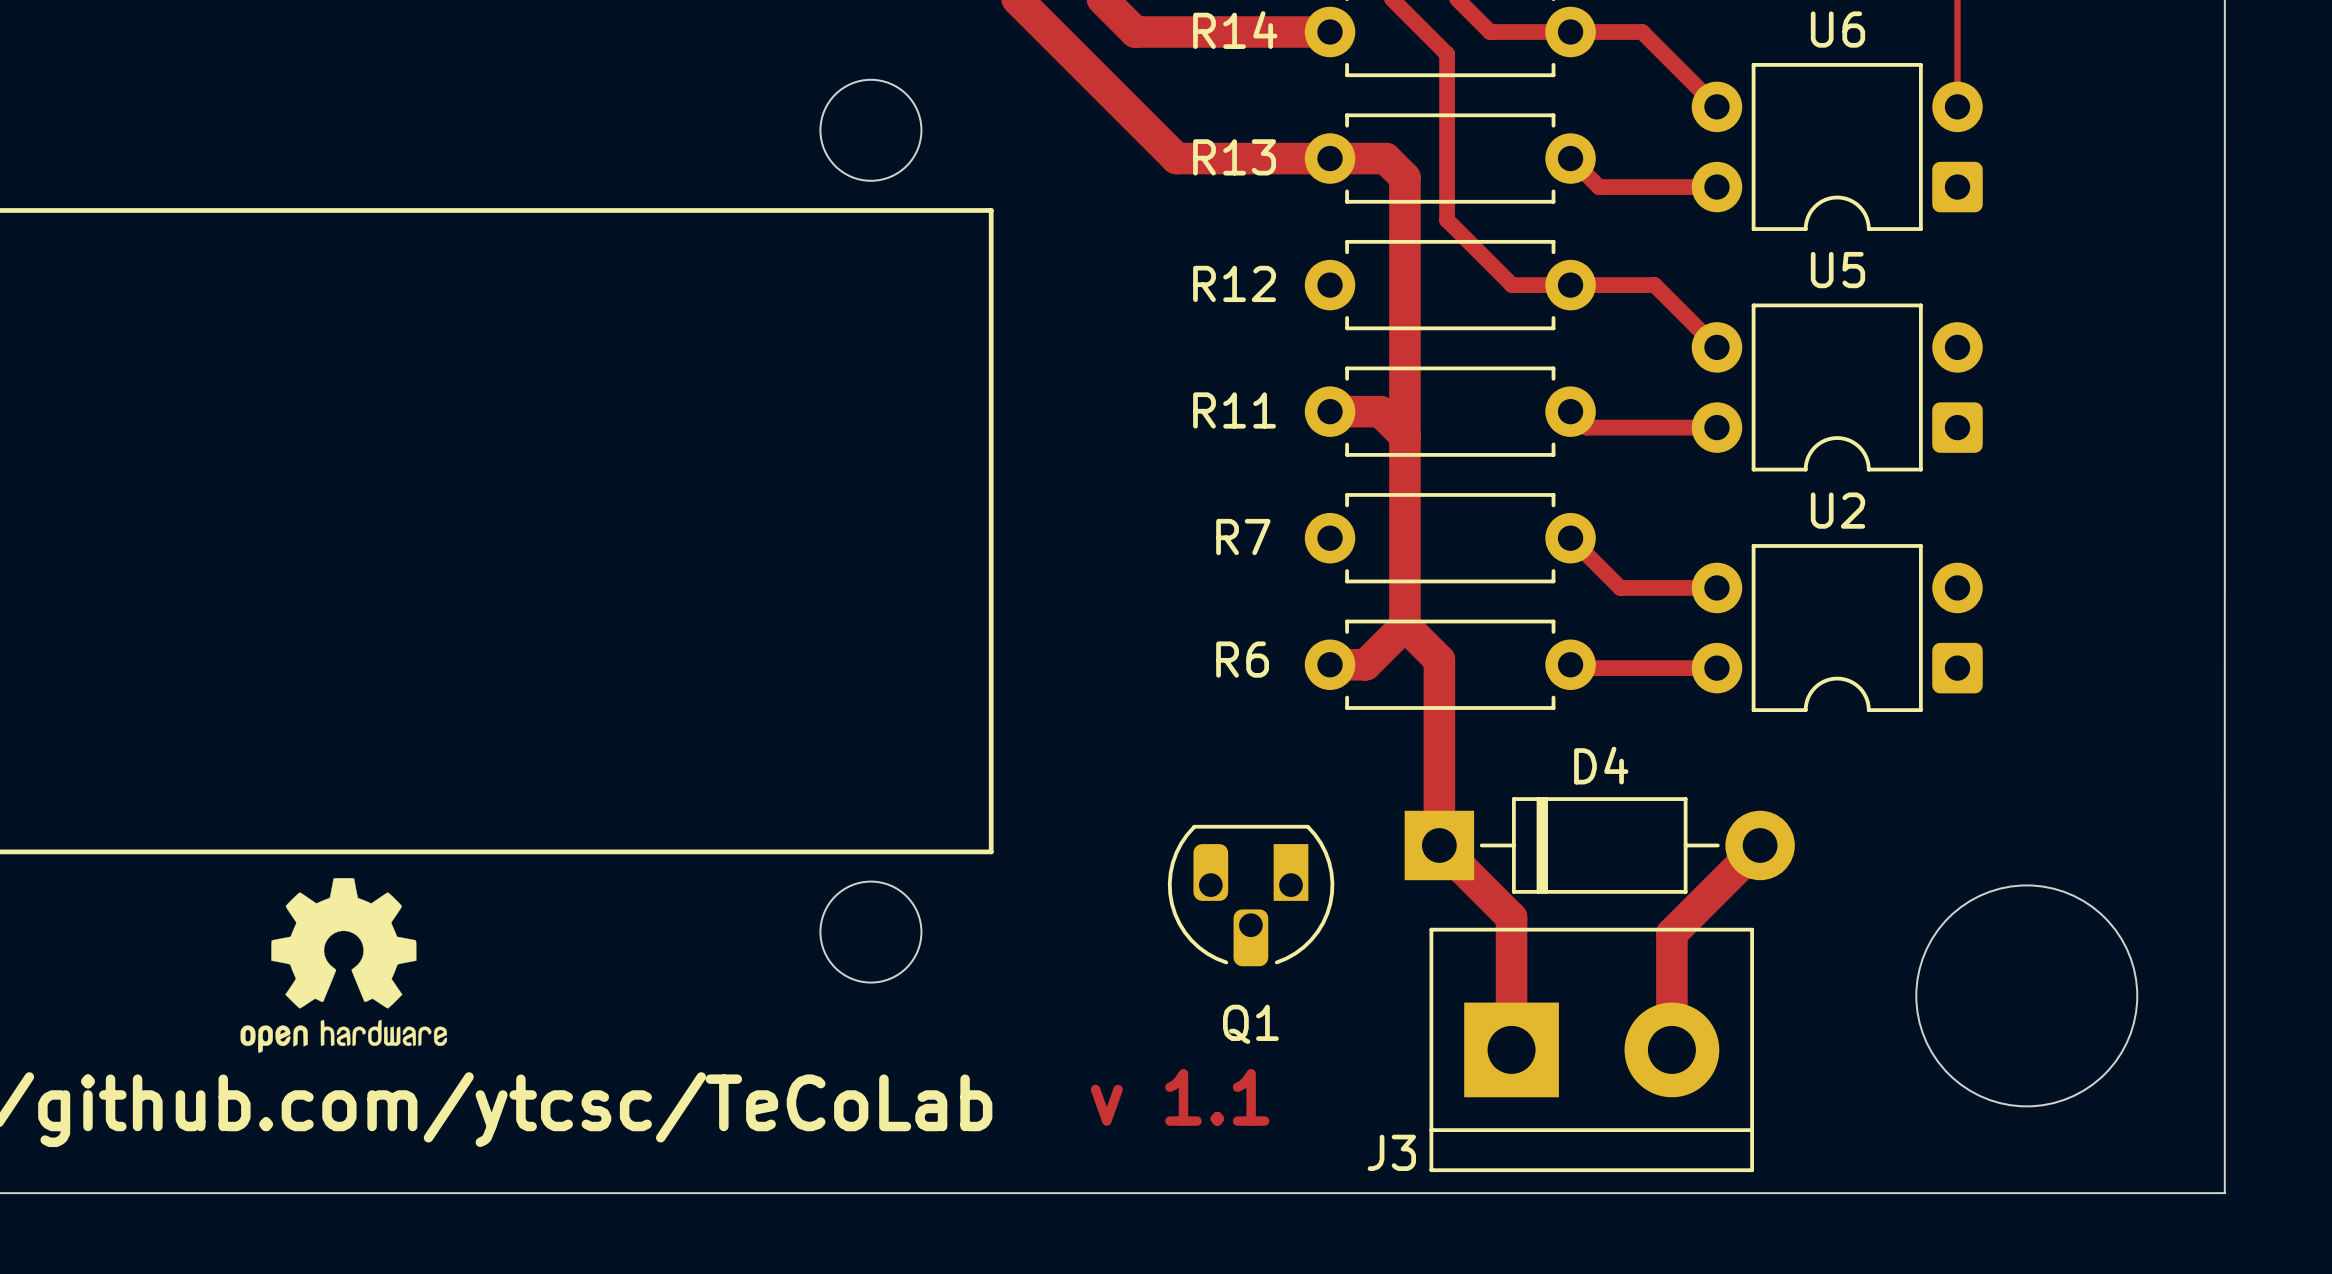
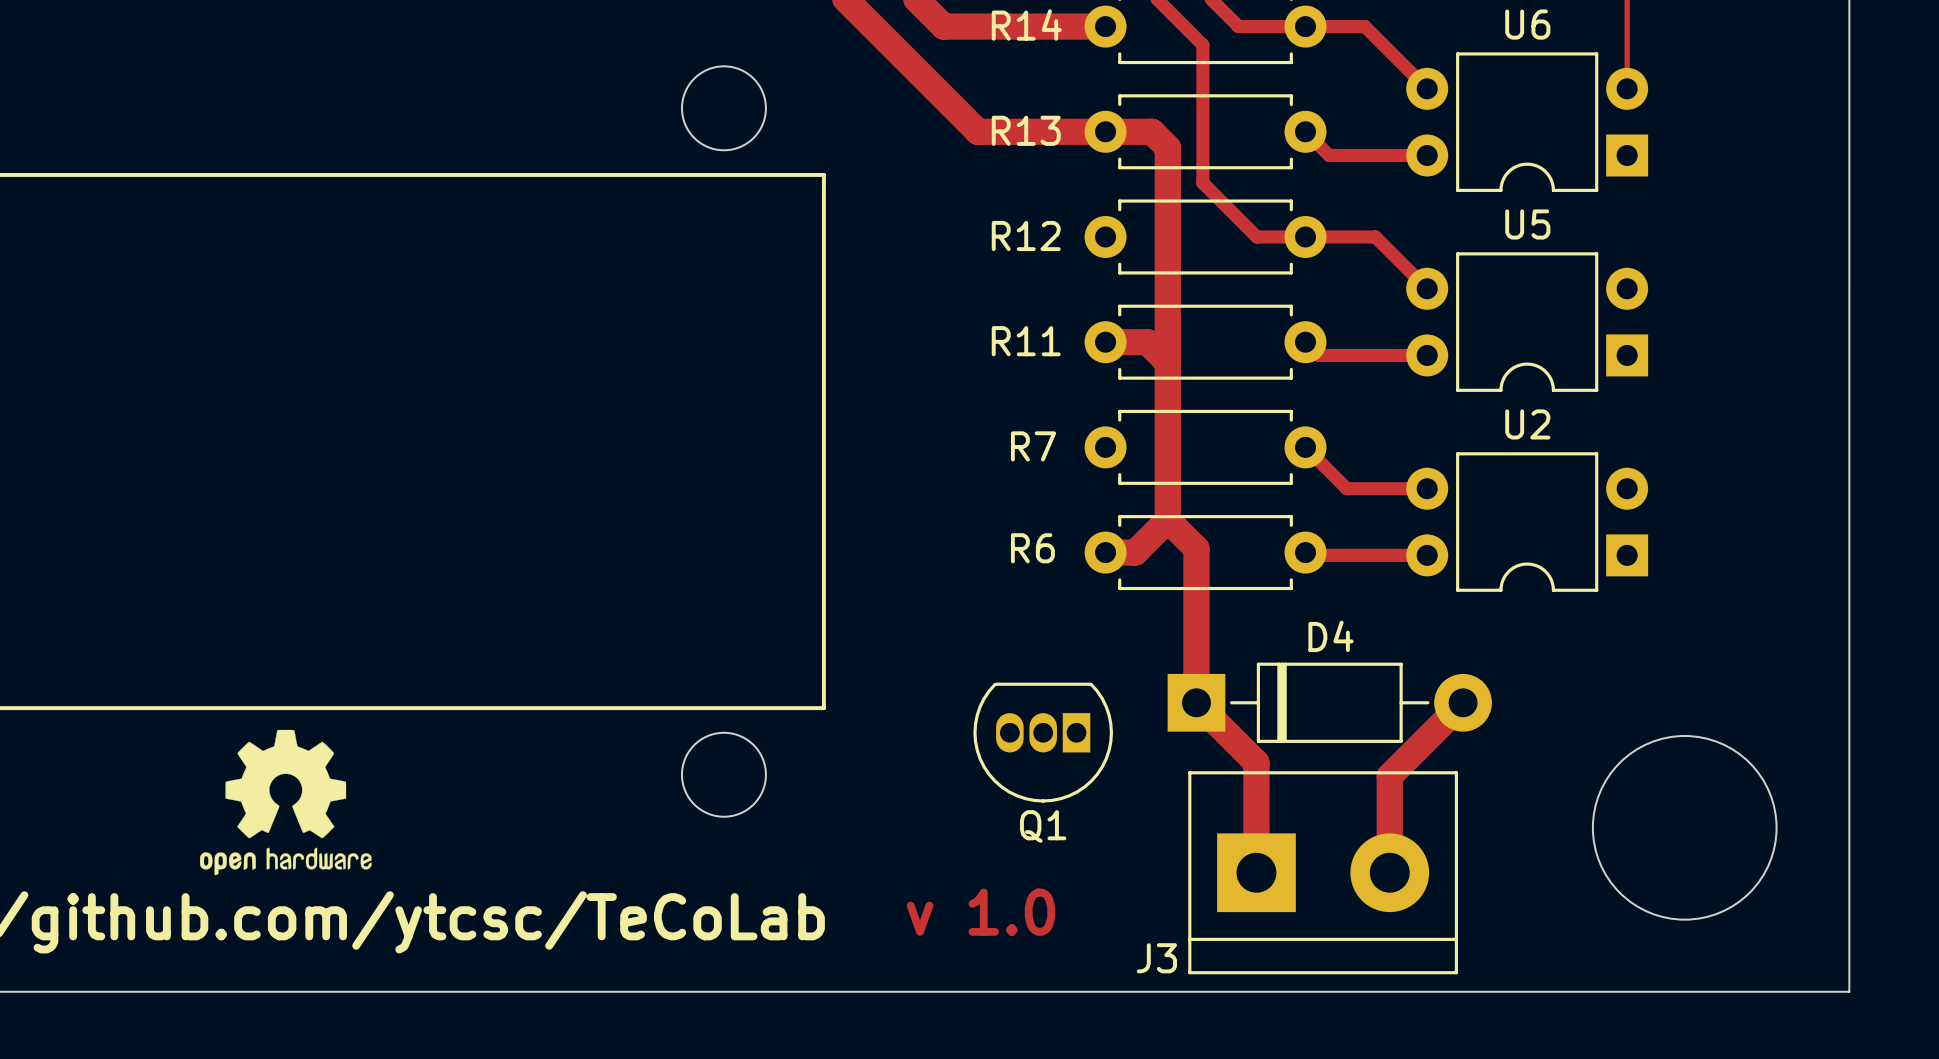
U6 footprint: [1691, 63, 1983, 231] -> [1406, 52, 1649, 192]
U5 footprint: [1691, 303, 1983, 472] -> [1406, 252, 1649, 392]
U2 footprint: [1691, 544, 1983, 713] -> [1406, 452, 1649, 592]
Q1 footprint: [1167, 824, 1335, 967] -> [973, 682, 1113, 803]
text: v 1.1 (1180, 1097) -> v 1.0 (980, 912)

